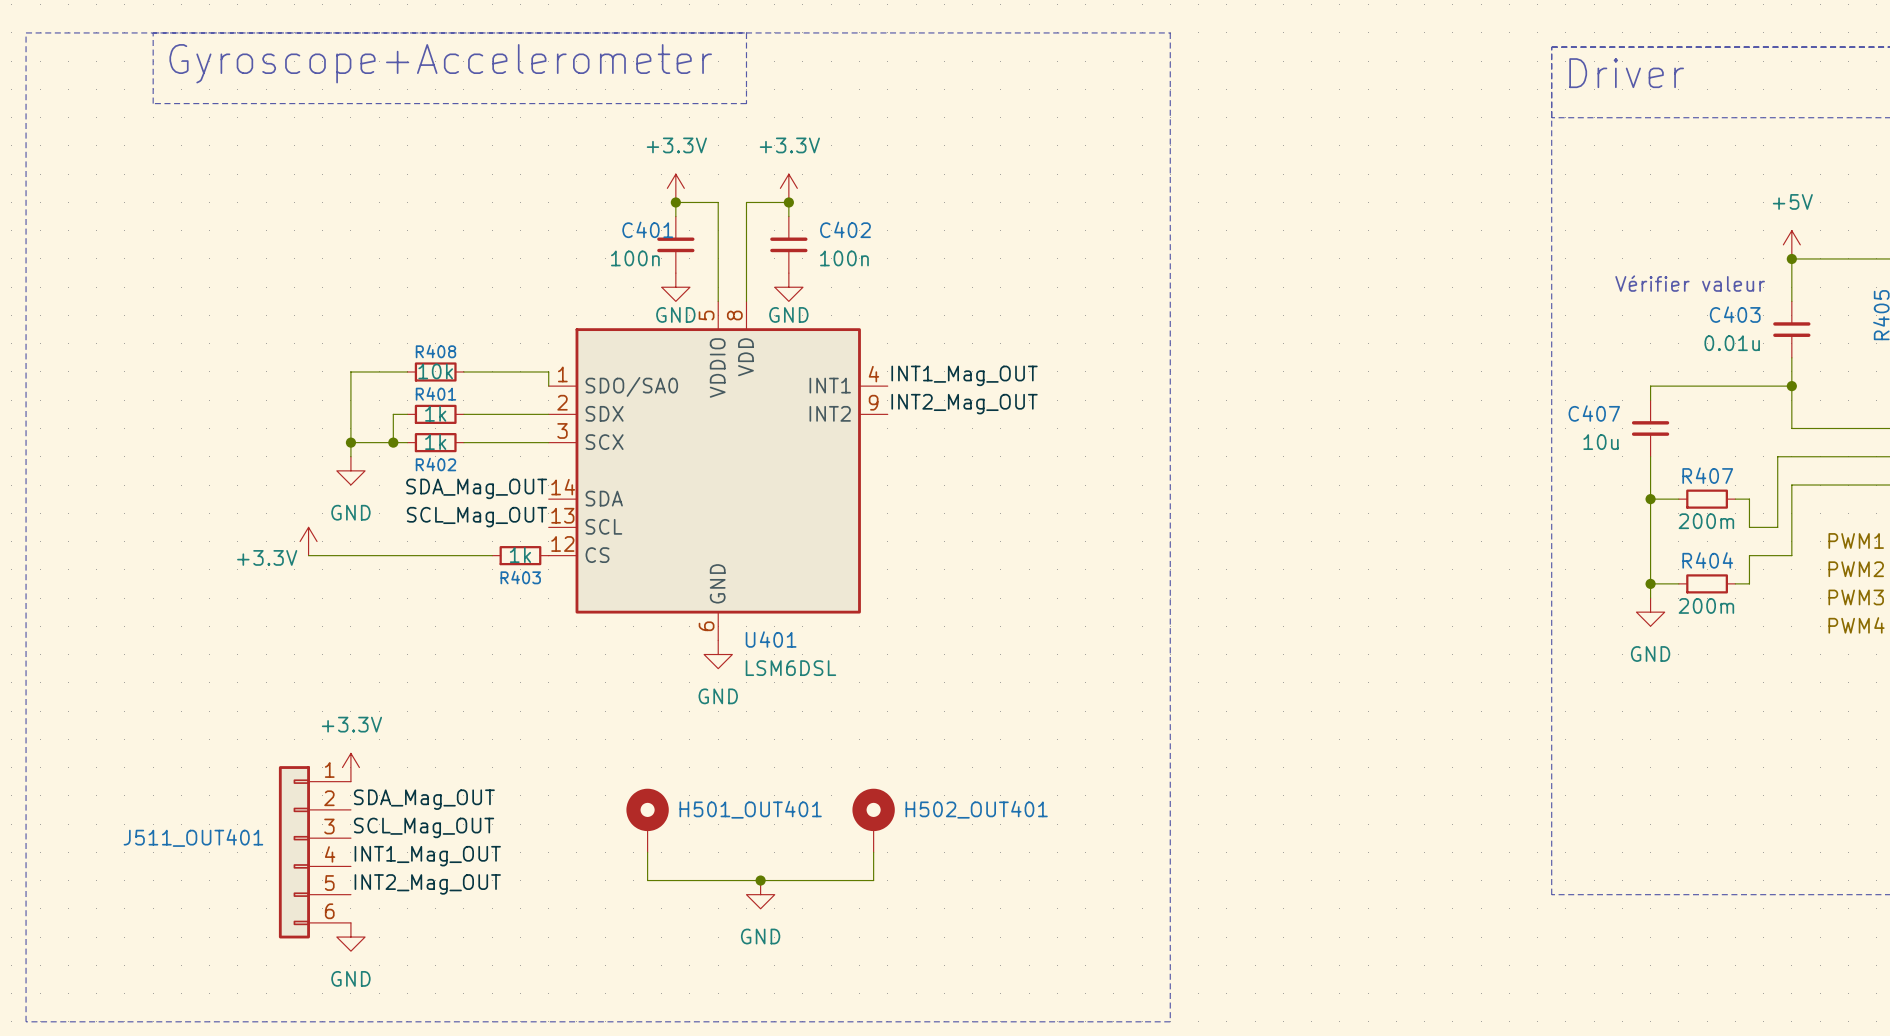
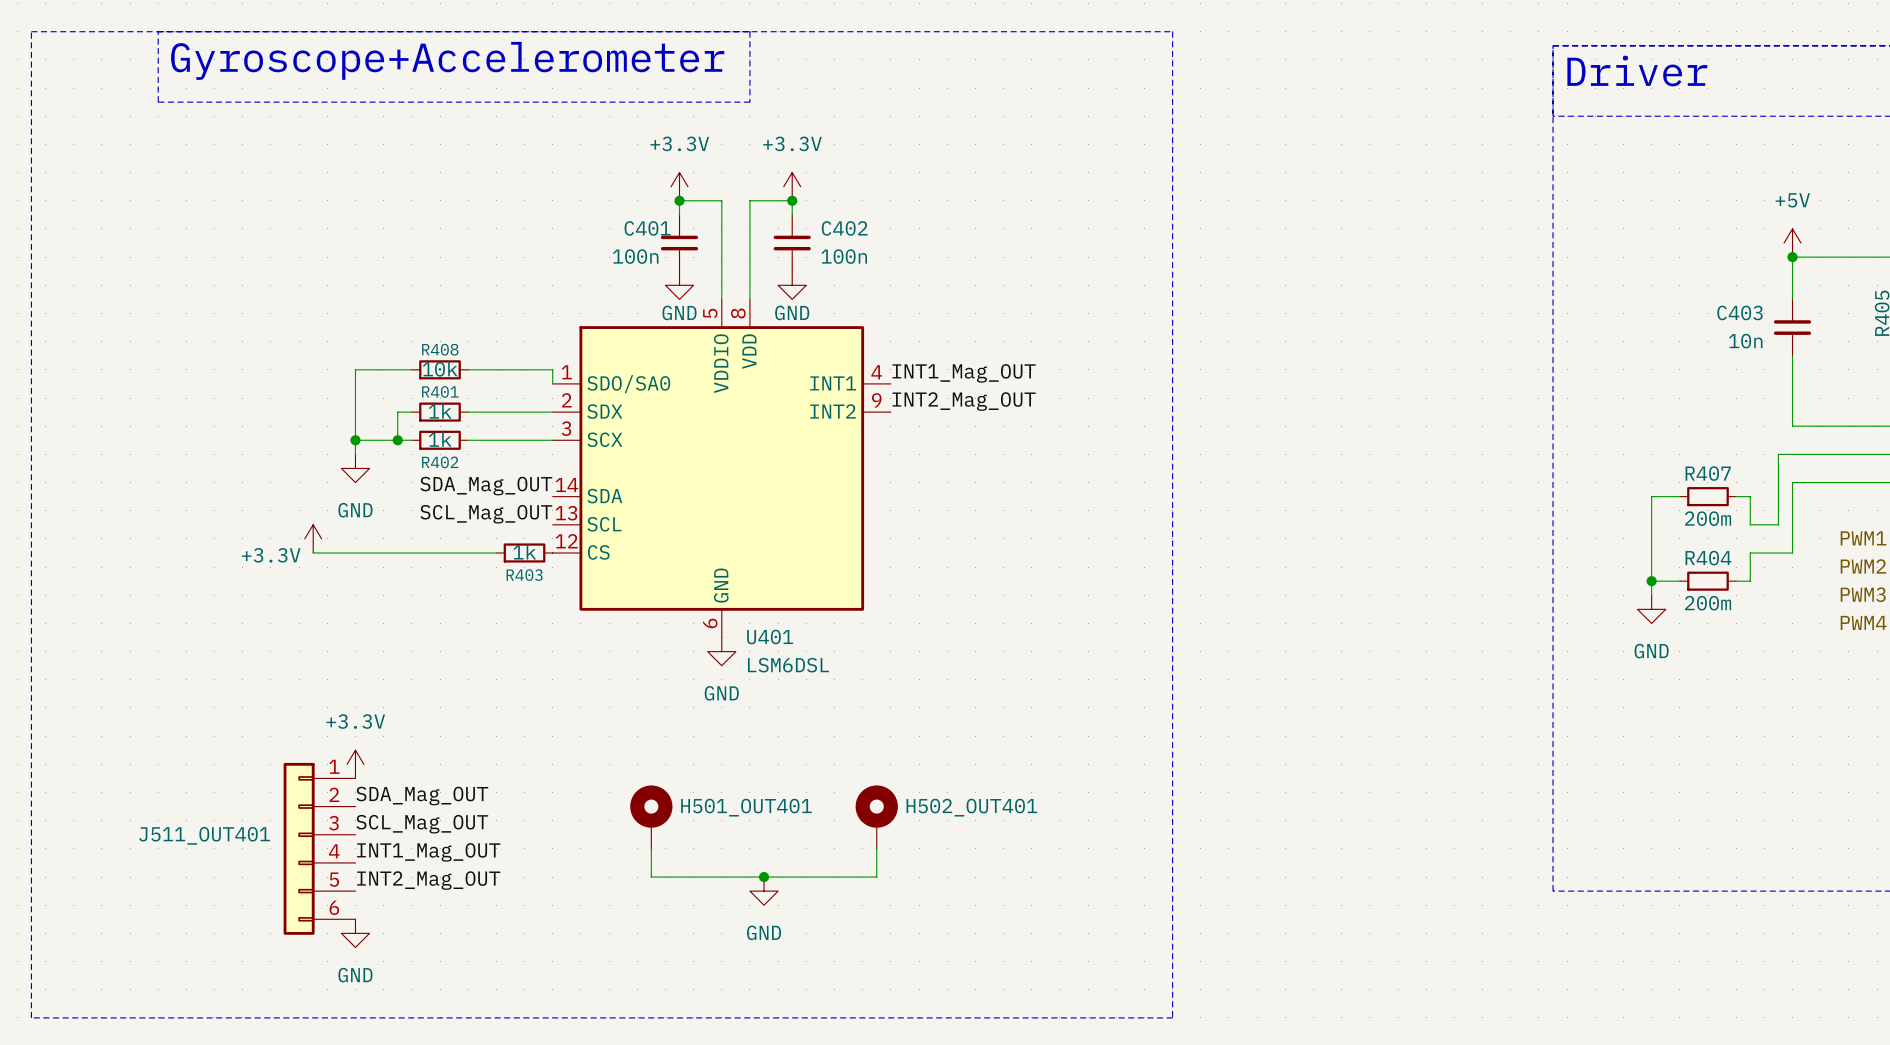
text: Vérifier valeur (1690, 283) -> none
C403 value: 0.01u (1732, 343) -> 10n (1745, 341)
wire: (1791, 386) (1650, 386) (1650, 400) -> none
junction: (1791, 386) -> none
C407: 10u (1650, 428) -> none
wire: (1650, 456) (1650, 499) -> none
junction: (1650, 499) -> none

